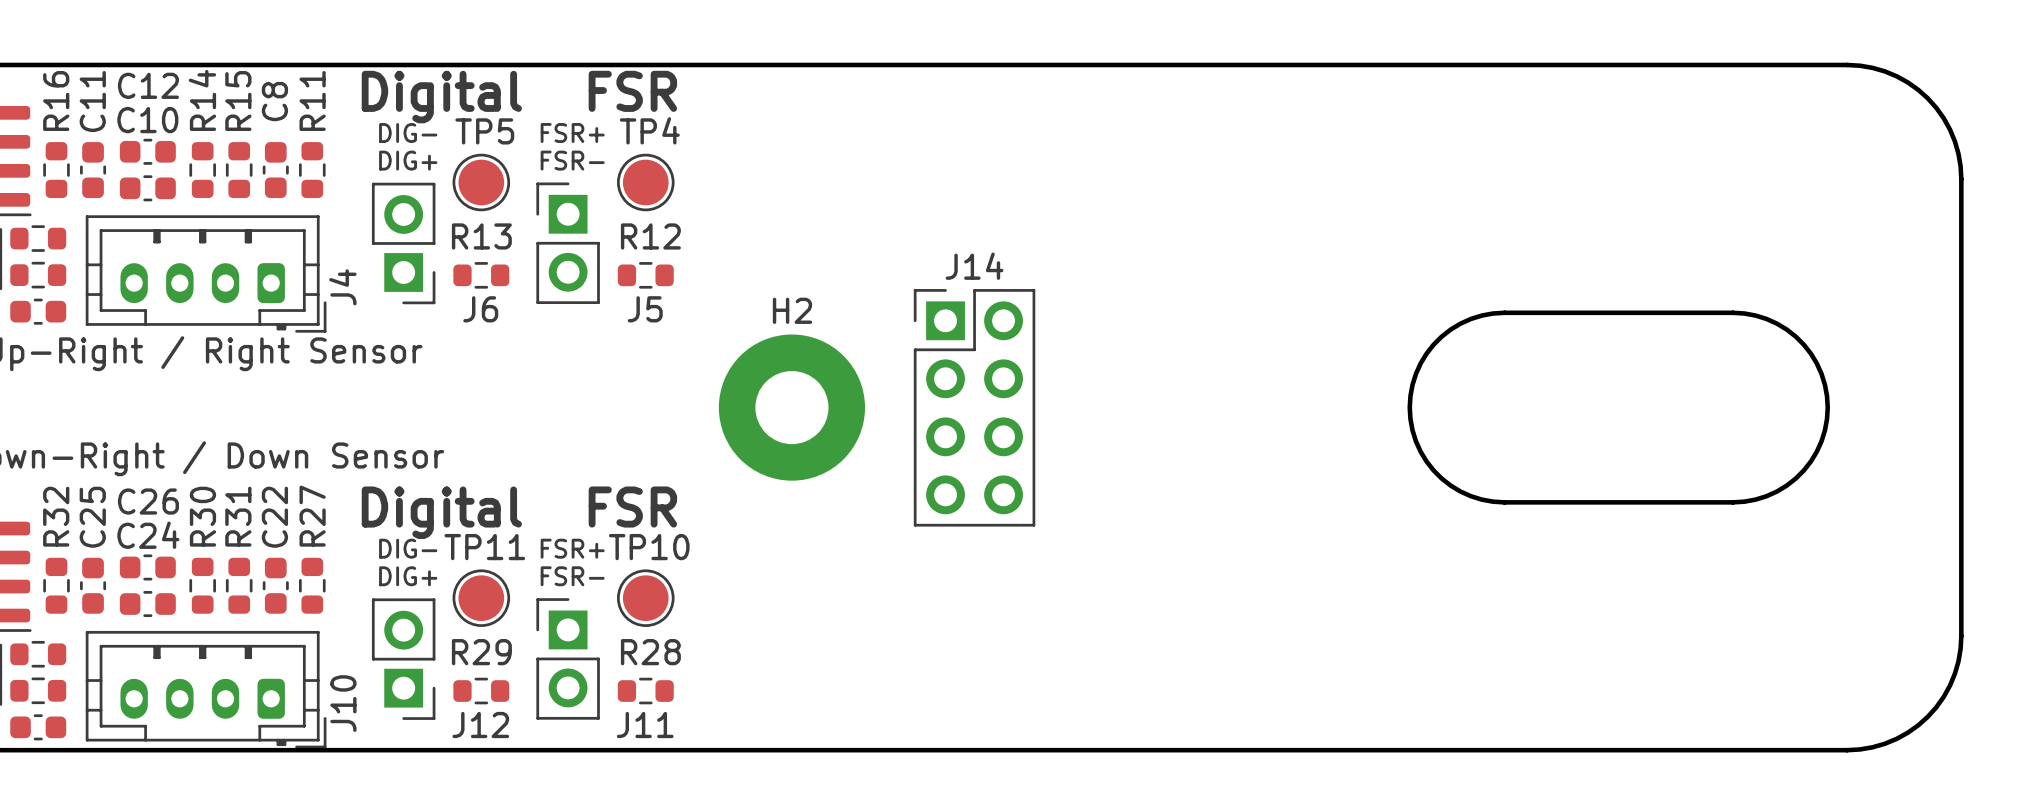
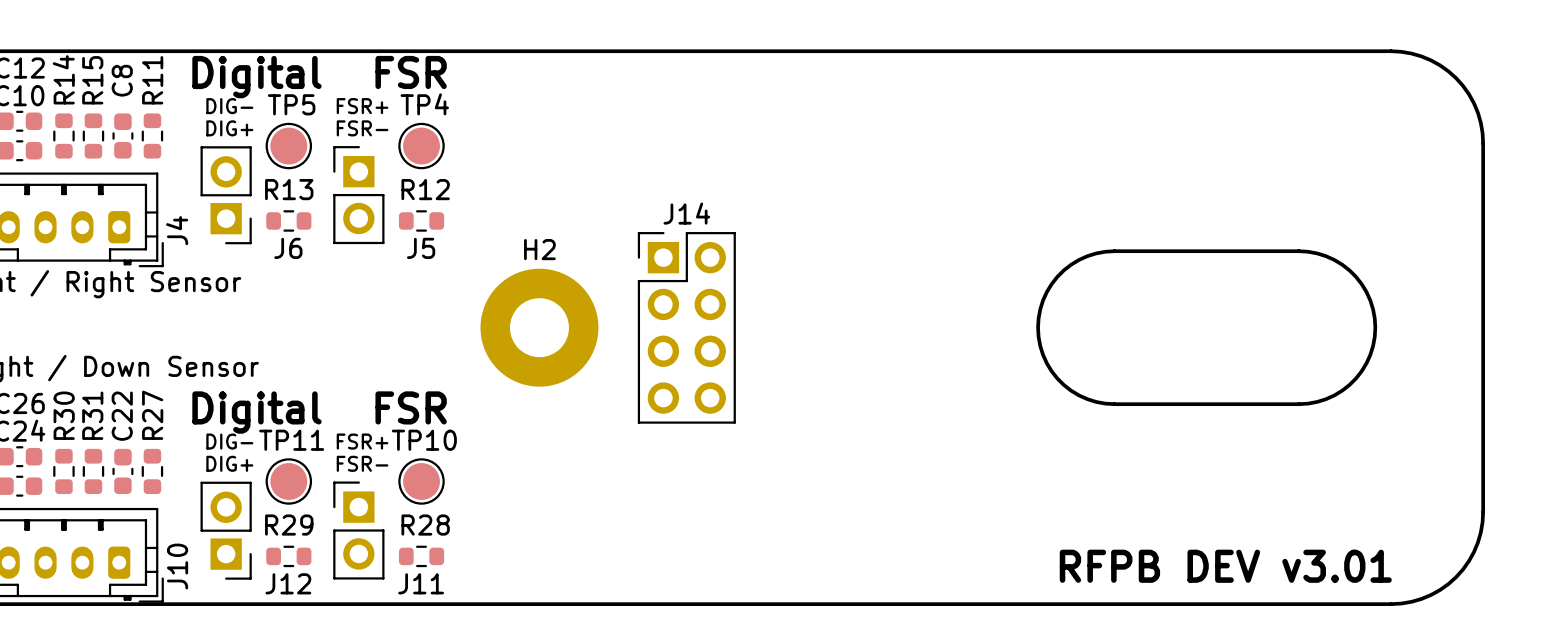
text: none -> RFPB DEV v3.01 (1225, 566)

